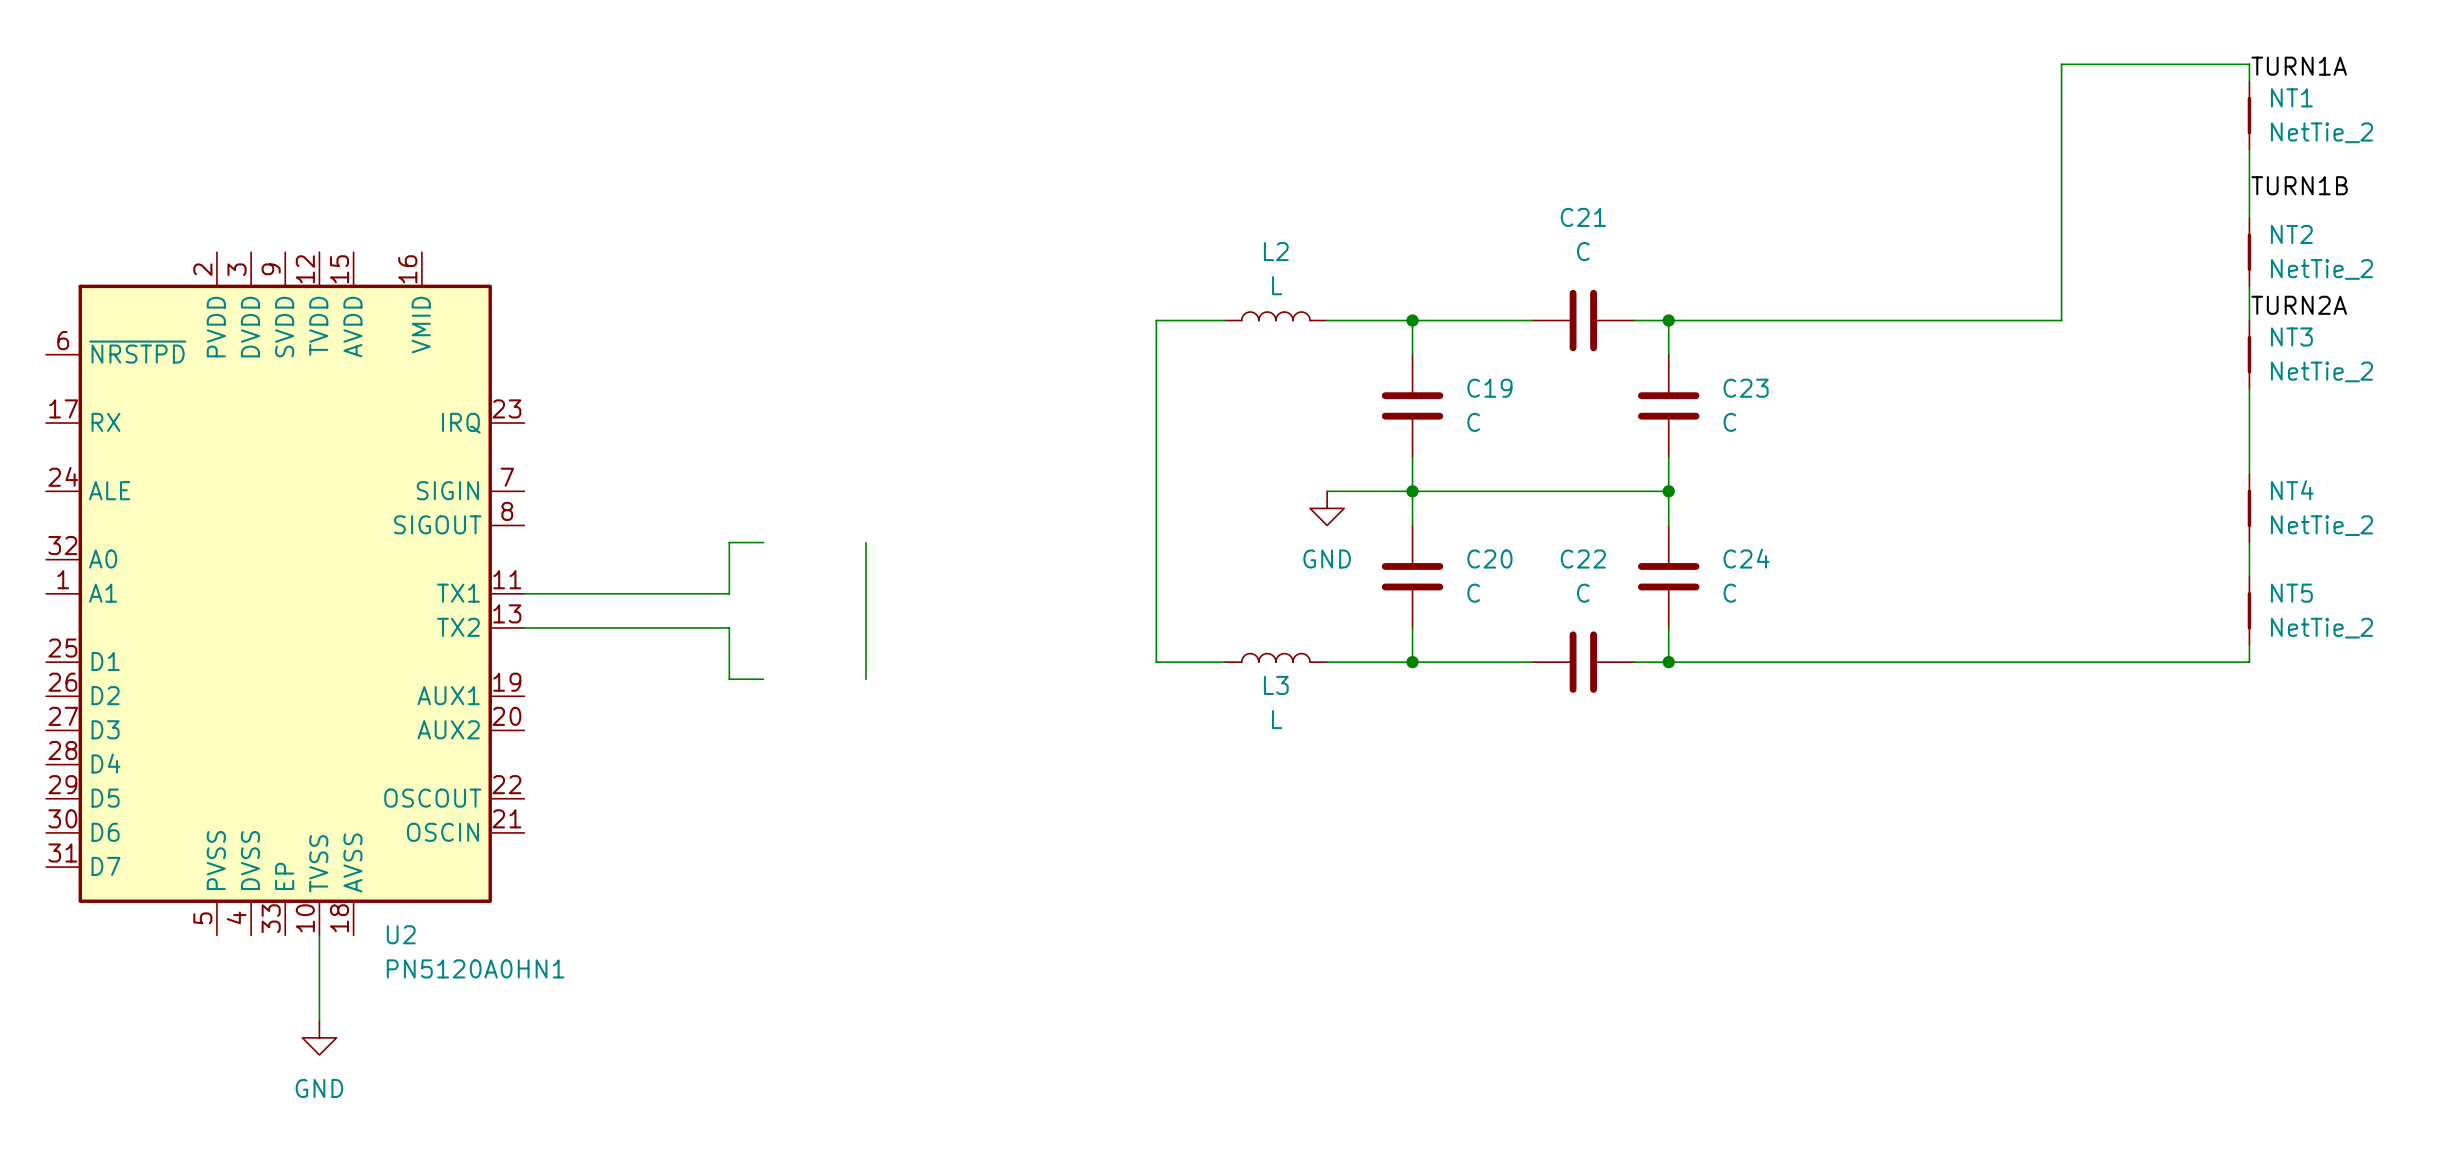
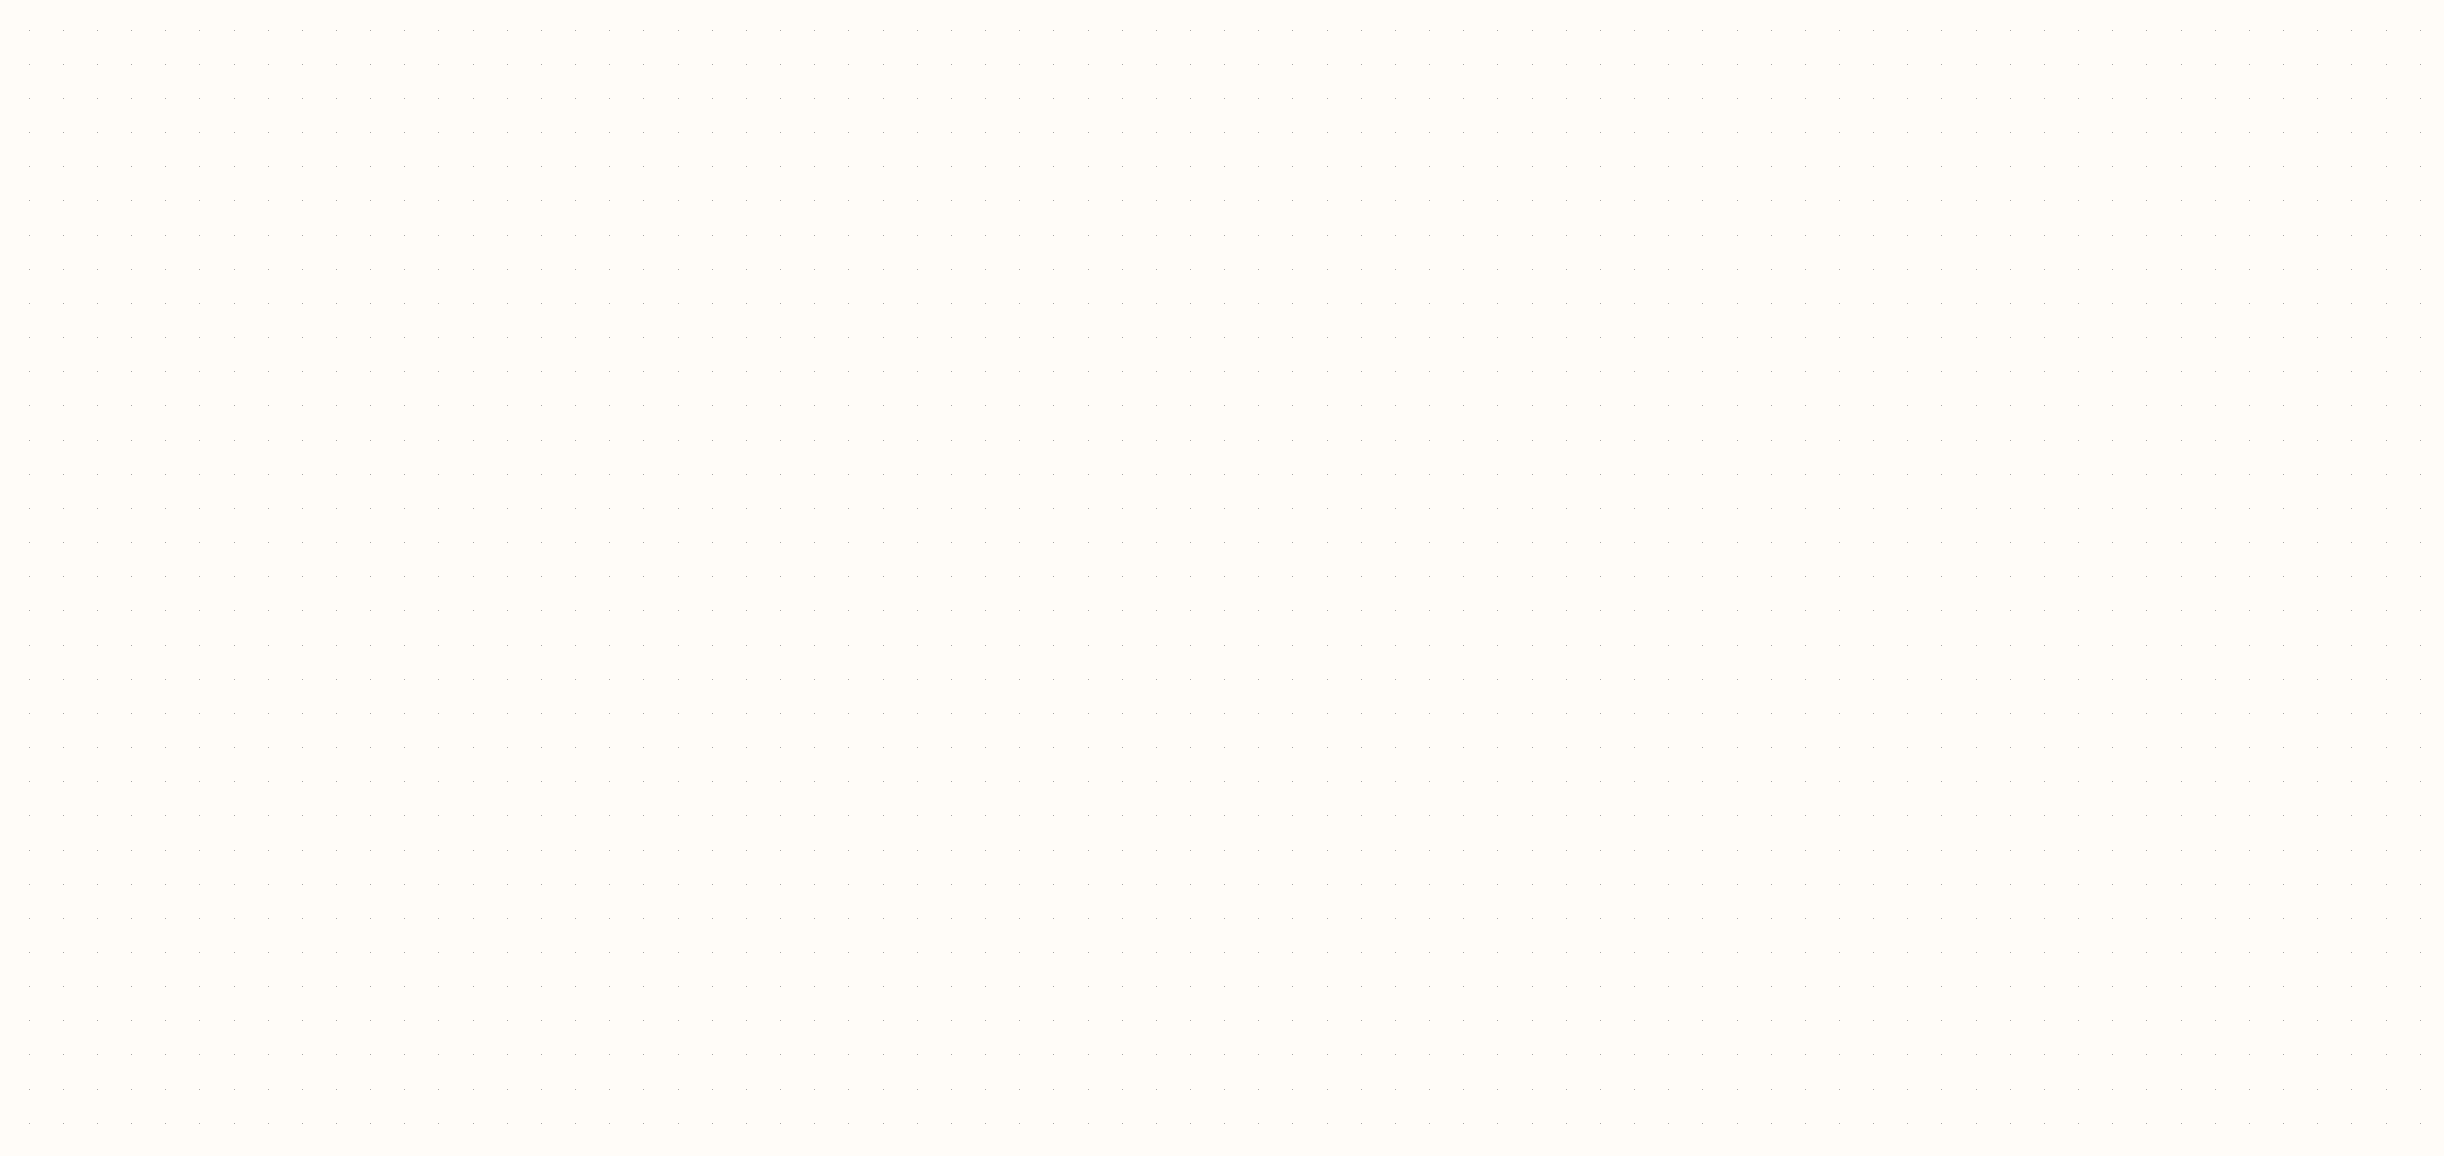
label: TURN1A (2299, 66) -> none
wire: (2249, 81) (2249, 64) (2061, 64) (2061, 320) (1634, 320) -> none
NT1: NetTie_2 (2249, 115) -> none
wire: (2249, 149) (2249, 218) -> none
label: TURN1B (2299, 185) -> none
NT2: NetTie_2 (2249, 252) -> none
wire: (2249, 286) (2249, 320) -> none
label: TURN2A (2299, 305) -> none
L2: L (1275, 316) -> none
wire: (1224, 320) (1156, 320) (1156, 662) (1224, 662) -> none
wire: (1327, 320) (1532, 320) -> none
wire: (1412, 320) (1412, 354) -> none
junction: (1412, 320) -> none
C21: C (1583, 320) -> none
wire: (1668, 320) (1668, 354) -> none
junction: (1668, 320) -> none
NT3: NetTie_2 (2249, 354) -> none
wire: (2249, 388) (2249, 474) -> none
C19: C (1412, 405) -> none
C23: C (1668, 405) -> none
wire: (1412, 457) (1412, 525) -> none
wire: (1668, 457) (1668, 525) -> none
wire: (1327, 491) (1668, 491) -> none
junction: (1412, 491) -> none
junction: (1668, 491) -> none
power symbol: GND (1327, 508) -> none
NT4: NetTie_2 (2249, 508) -> none
wire: (763, 542) (729, 542) (729, 593) (524, 593) -> none
wire: (865, 542) (865, 679) -> none
wire: (2249, 542) (2249, 576) -> none
C20: C (1412, 576) -> none
C24: C (1668, 576) -> none
U2: PN5120A0HN1 (285, 593) -> none
NT5: NetTie_2 (2249, 610) -> none
wire: (524, 627) (729, 627) (729, 679) (763, 679) -> none
wire: (1412, 627) (1412, 662) -> none
wire: (1668, 627) (1668, 662) -> none
wire: (2249, 645) (2249, 662) (1634, 662) -> none
L3: L (1275, 657) -> none
wire: (1327, 662) (1532, 662) -> none
junction: (1412, 662) -> none
C22: C (1583, 662) -> none
junction: (1668, 662) -> none
wire: (319, 935) (319, 1020) -> none
power symbol: GND (319, 1037) -> none

